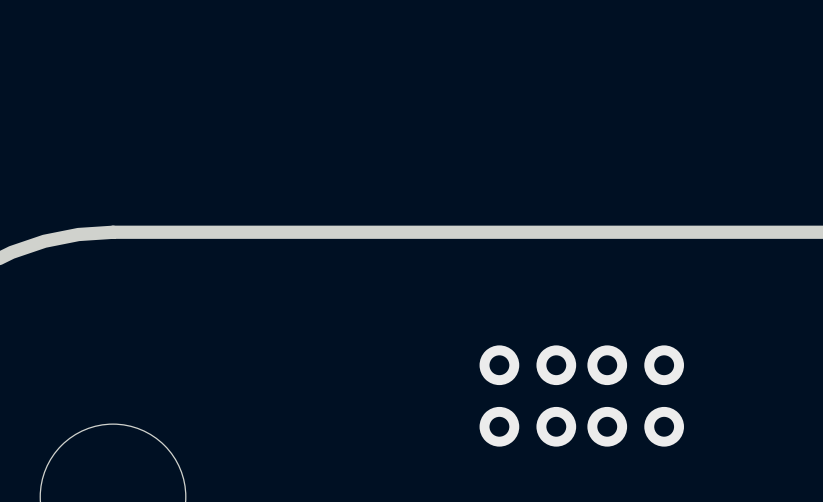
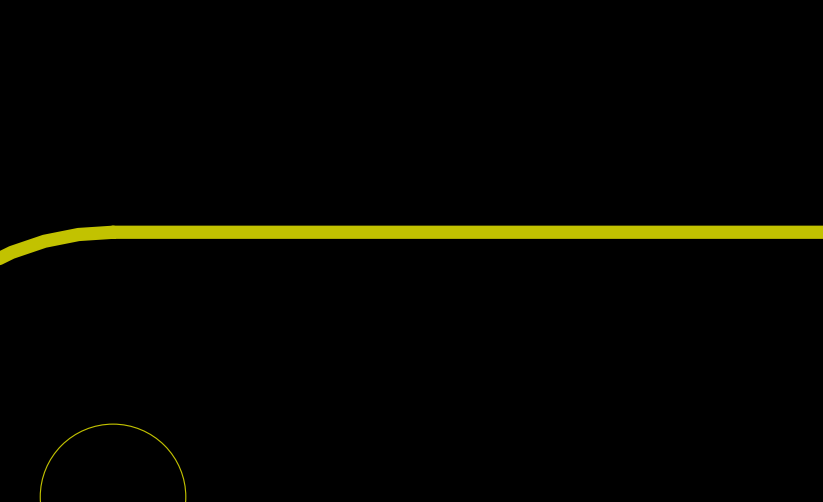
via: (499, 365) -> none
via: (556, 365) -> none
via: (607, 365) -> none
via: (664, 365) -> none
via: (499, 426) -> none
via: (556, 426) -> none
via: (607, 426) -> none
via: (664, 426) -> none

